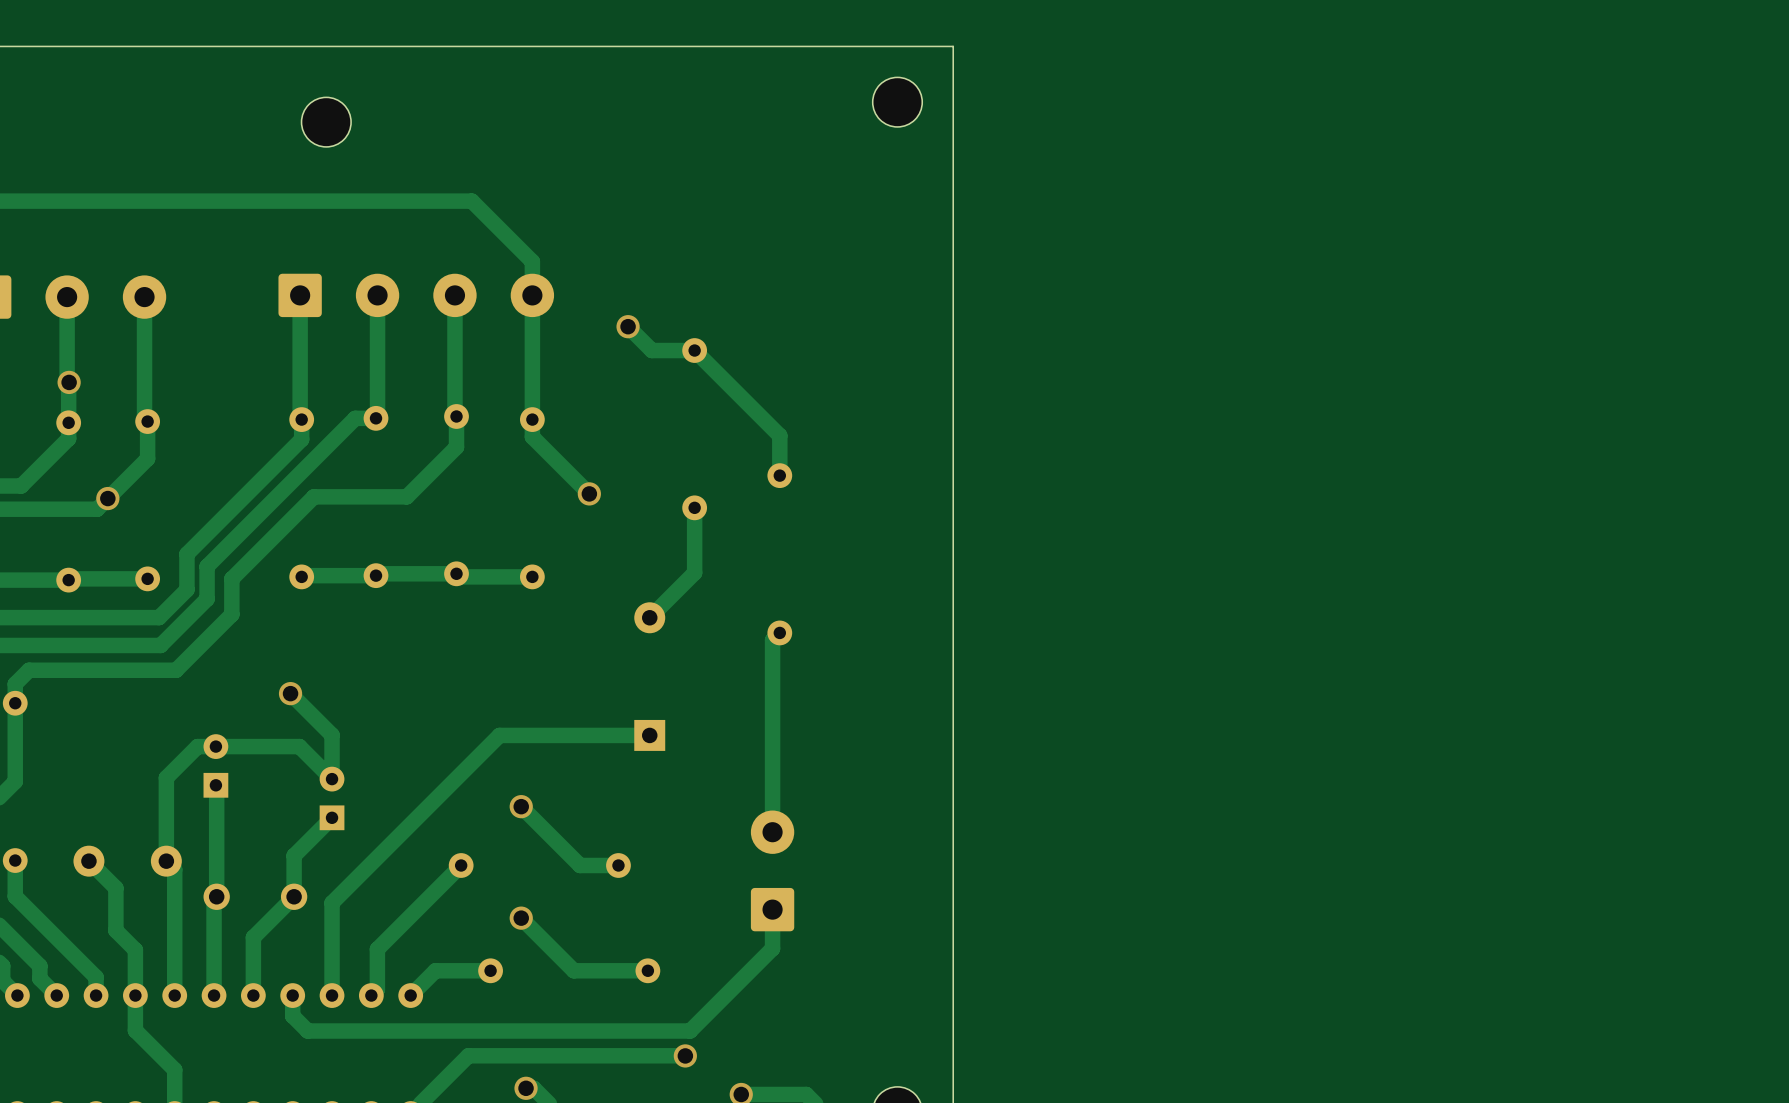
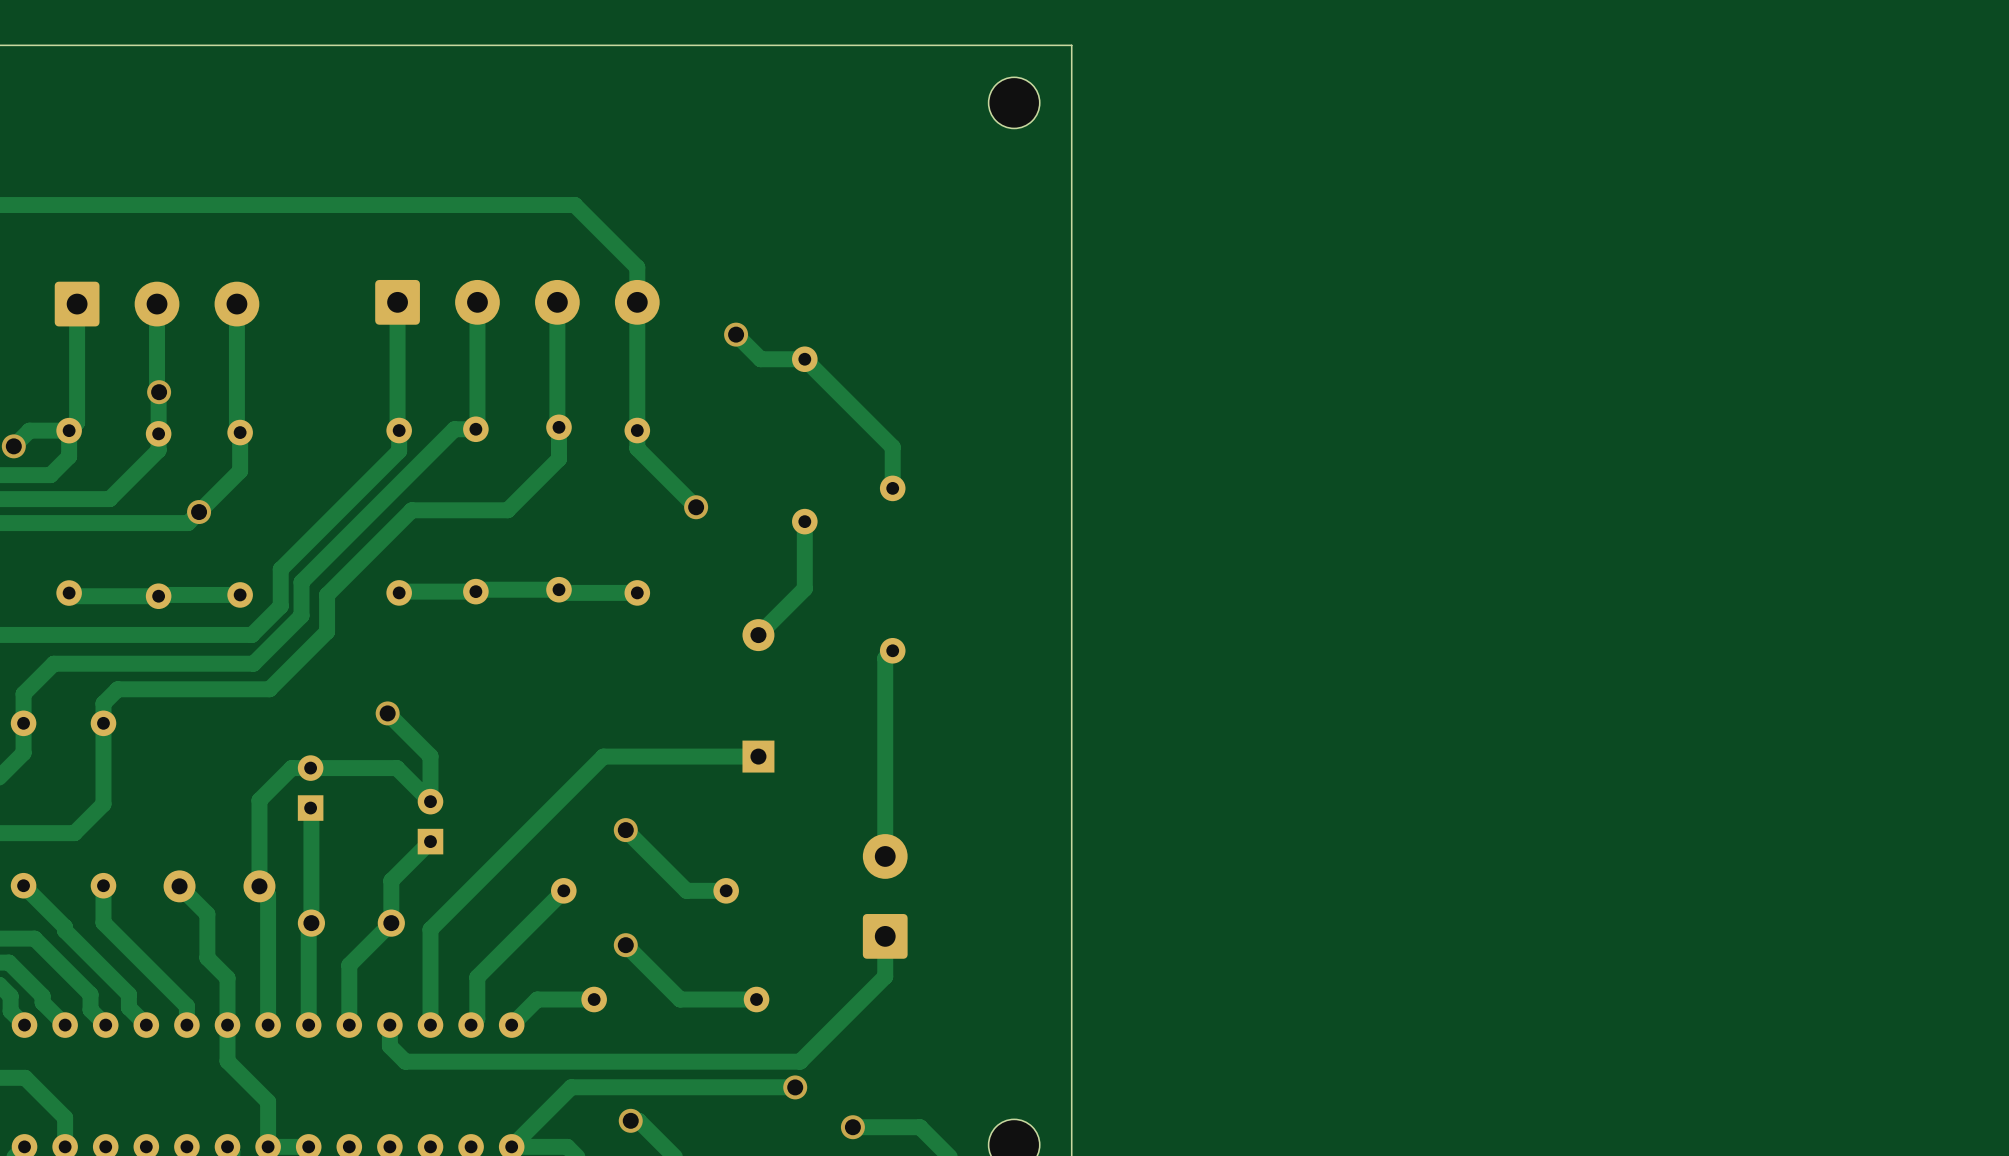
part: (326, 122) -> none

